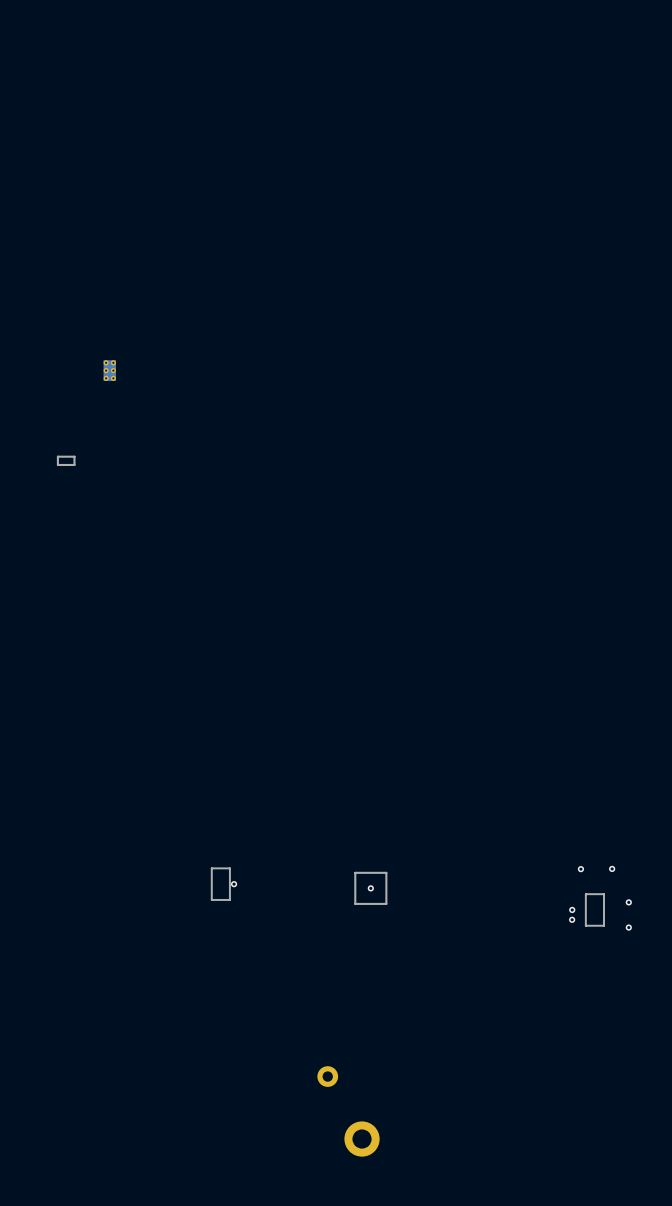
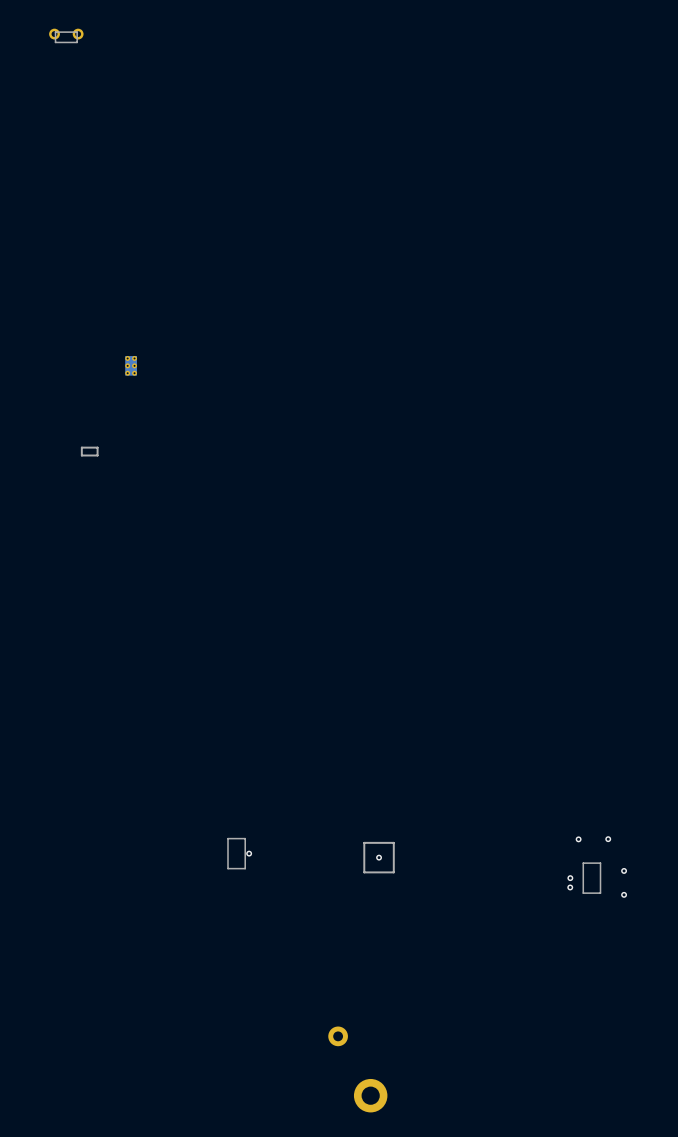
part: none -> (66, 35)

